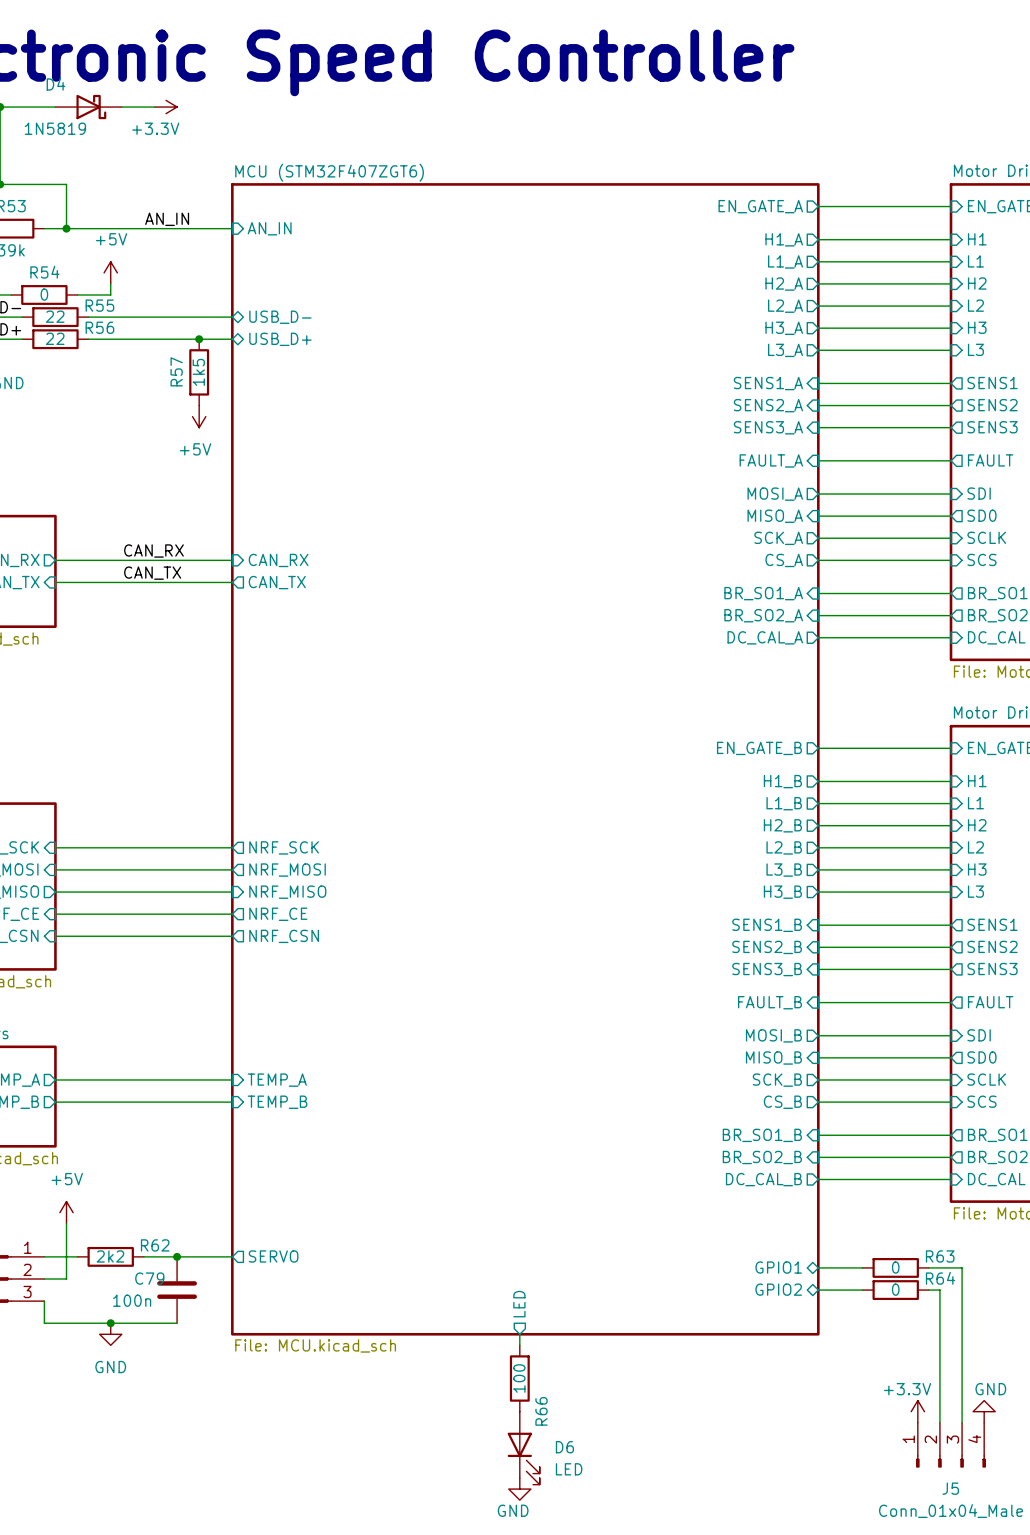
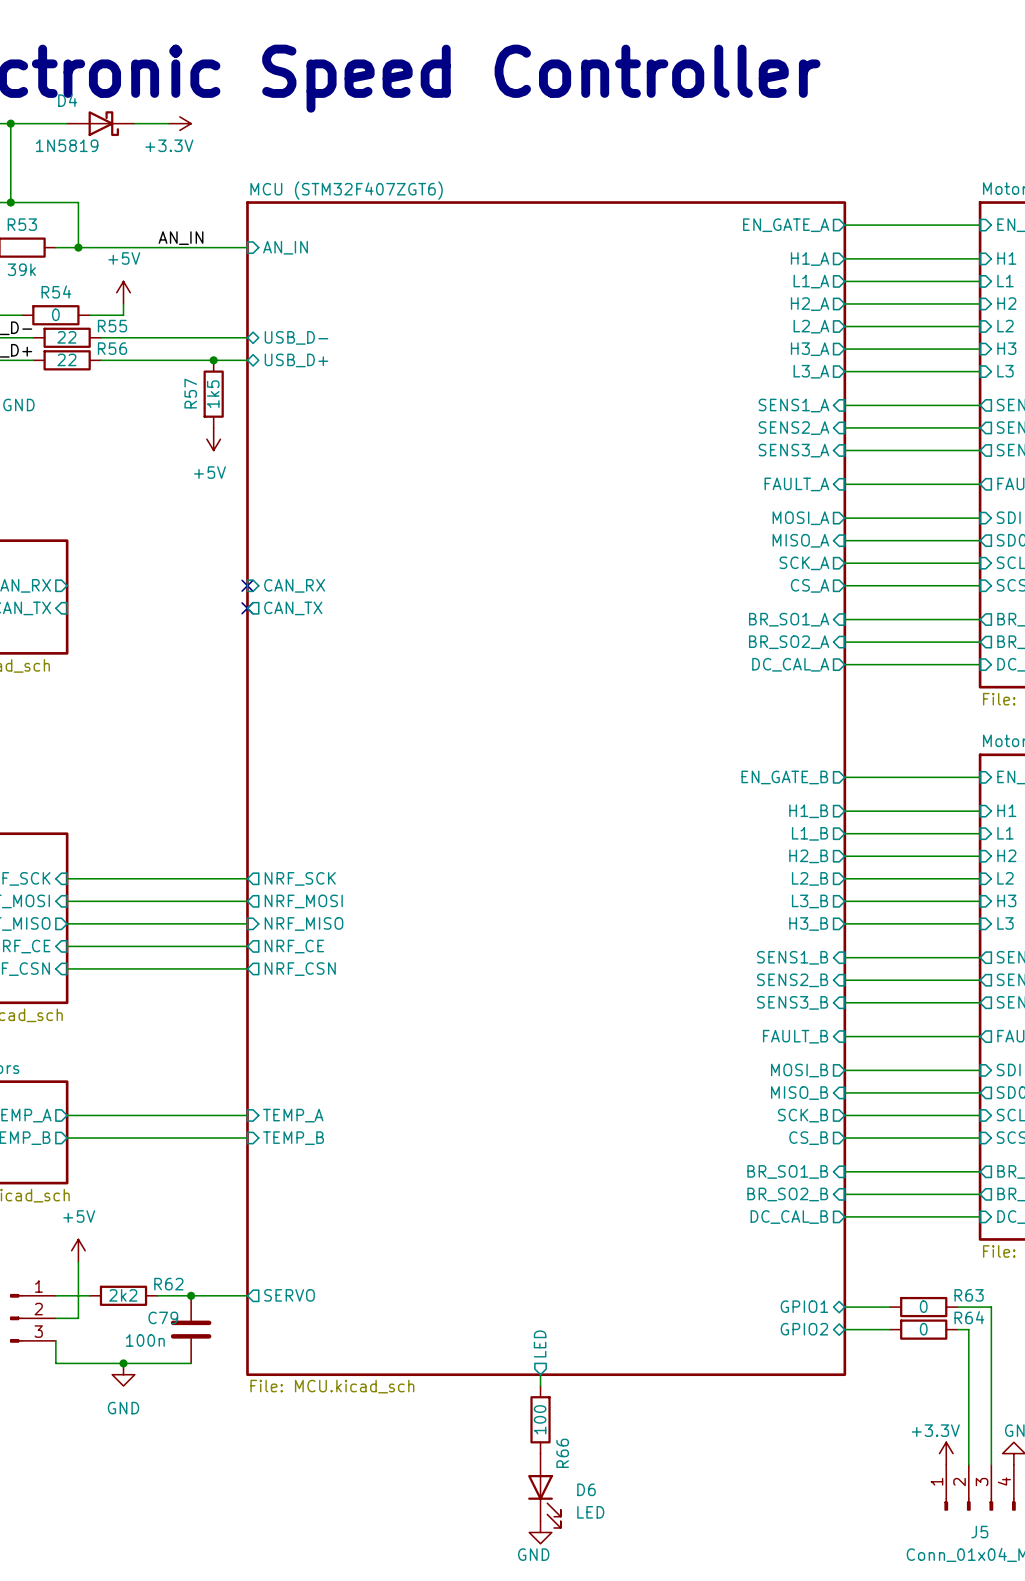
label: CAN_RX (153, 551) -> none
wire: (55, 560) (232, 560) -> none
no-connect mark: none -> (247, 585)
label: CAN_TX (152, 573) -> none
wire: (55, 582) (232, 582) -> none
no-connect mark: none -> (247, 608)

